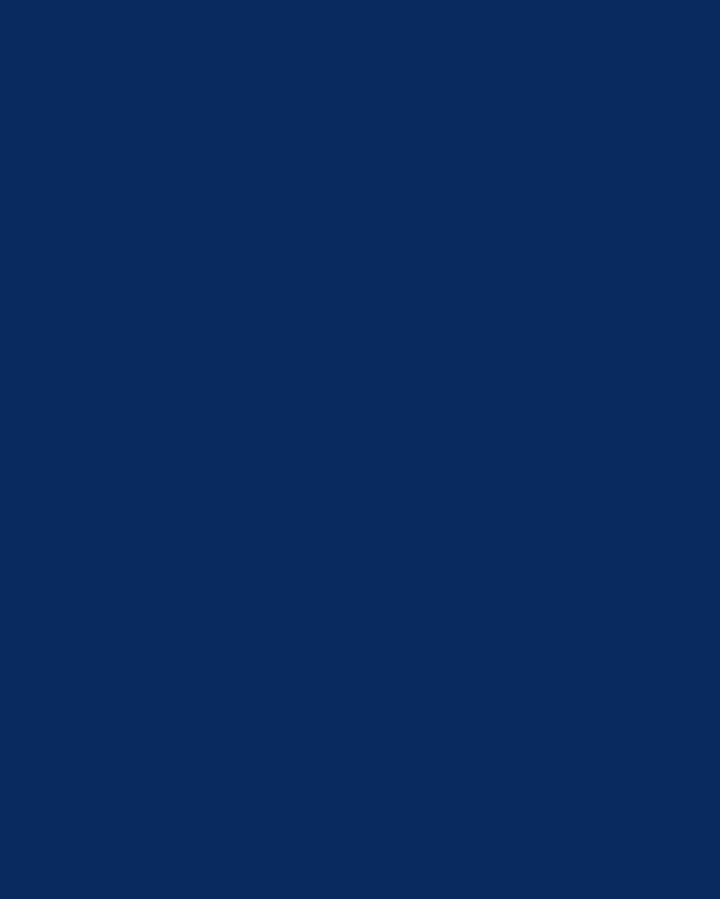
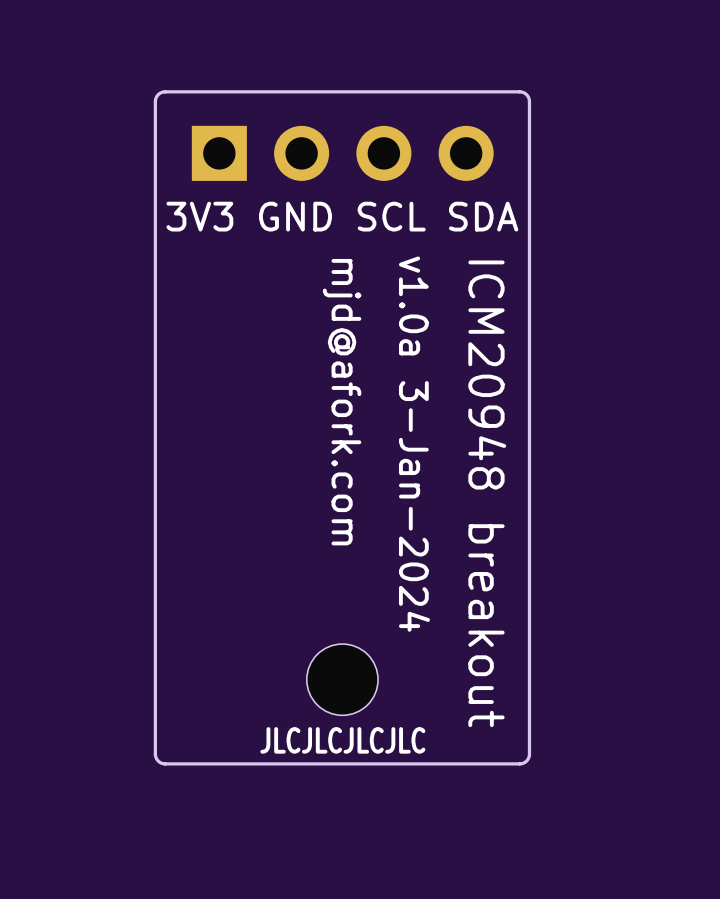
board edge: none -> (519, 91) (165, 91) (156, 96) (155, 754) (160, 762) (519, 763) (528, 759) (529, 101) (526, 94) (519, 91)
part: none -> (342, 153)
text: none -> 3V3 GND SCL SDA (342, 216)
text: none -> mjd@afork.com (342, 402)
text: none -> v1.0a 3-Jan-2024 (414, 444)
text: none -> ICM20948 breakout (487, 493)
part: none -> (342, 679)
text: none -> JLCJLCJLCJLC (342, 740)

